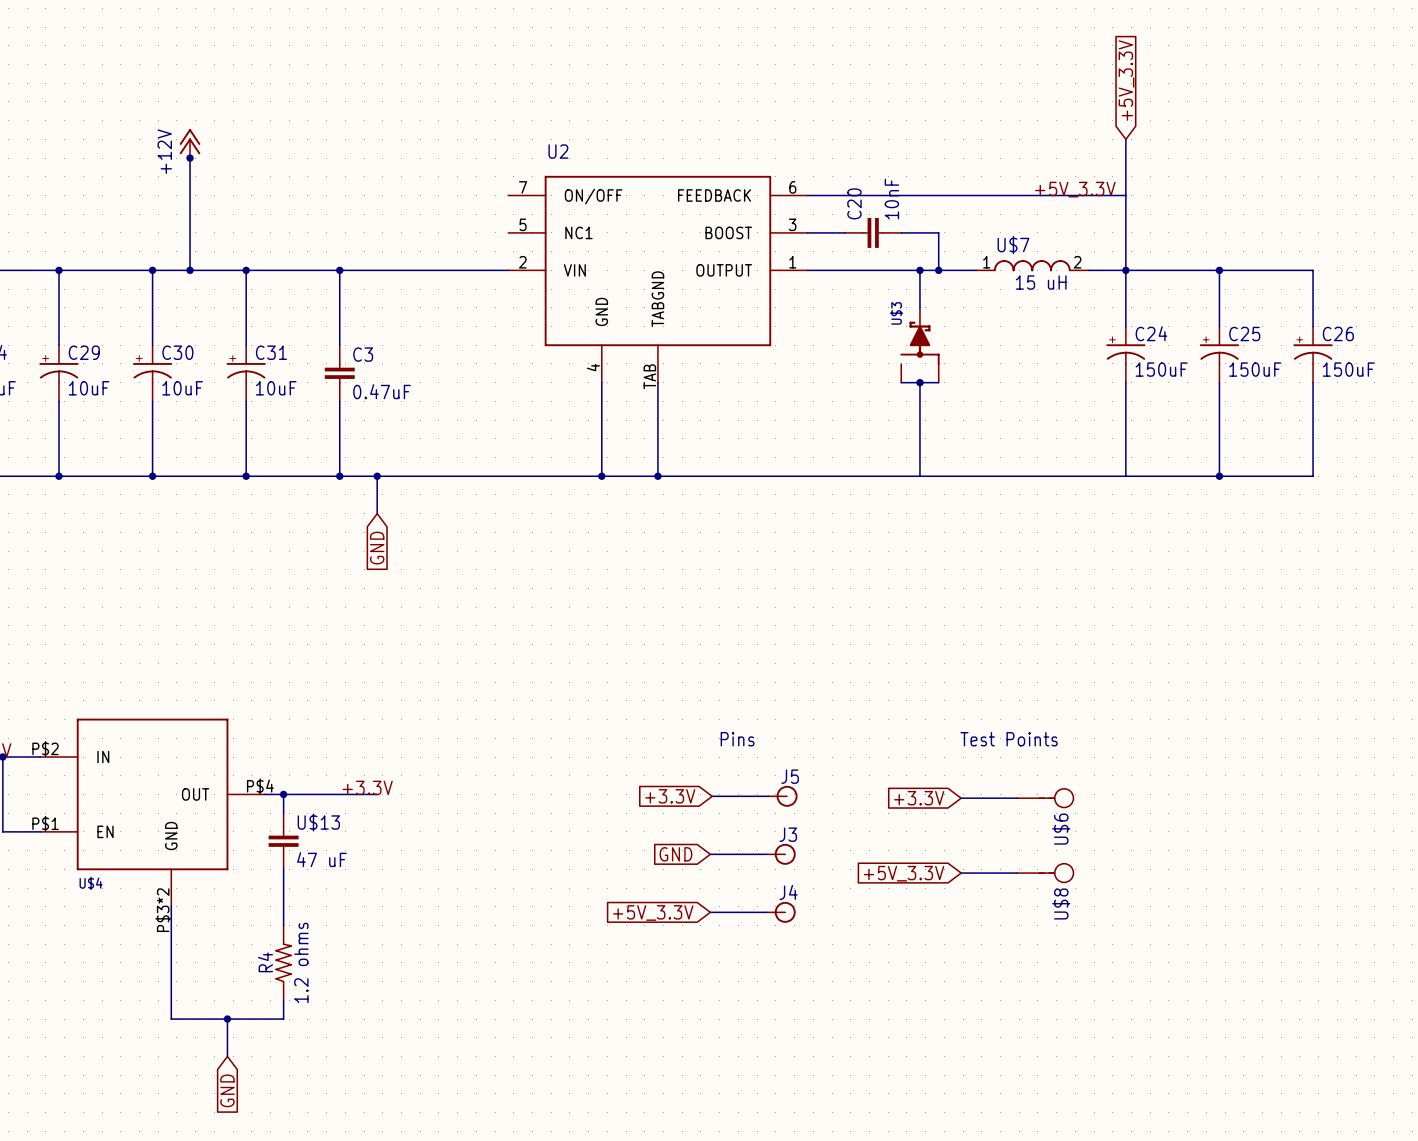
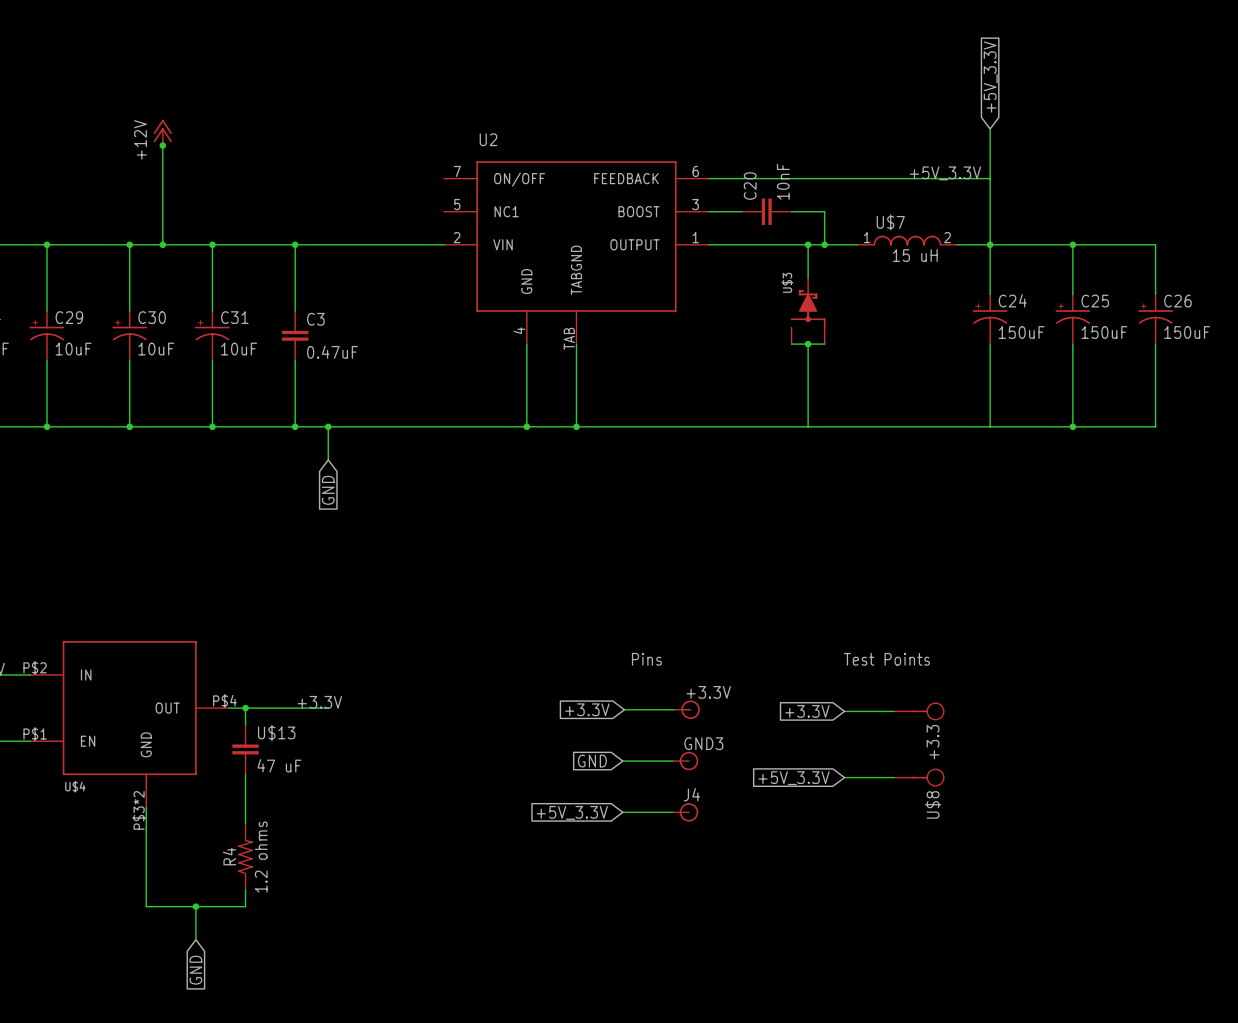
J5 name: J5 (790, 776) -> +3.3V (708, 692)
U$6 name: U$6 (1061, 829) -> +3.3 (933, 742)
J3 name: J3 (788, 834) -> GND3 (703, 743)

